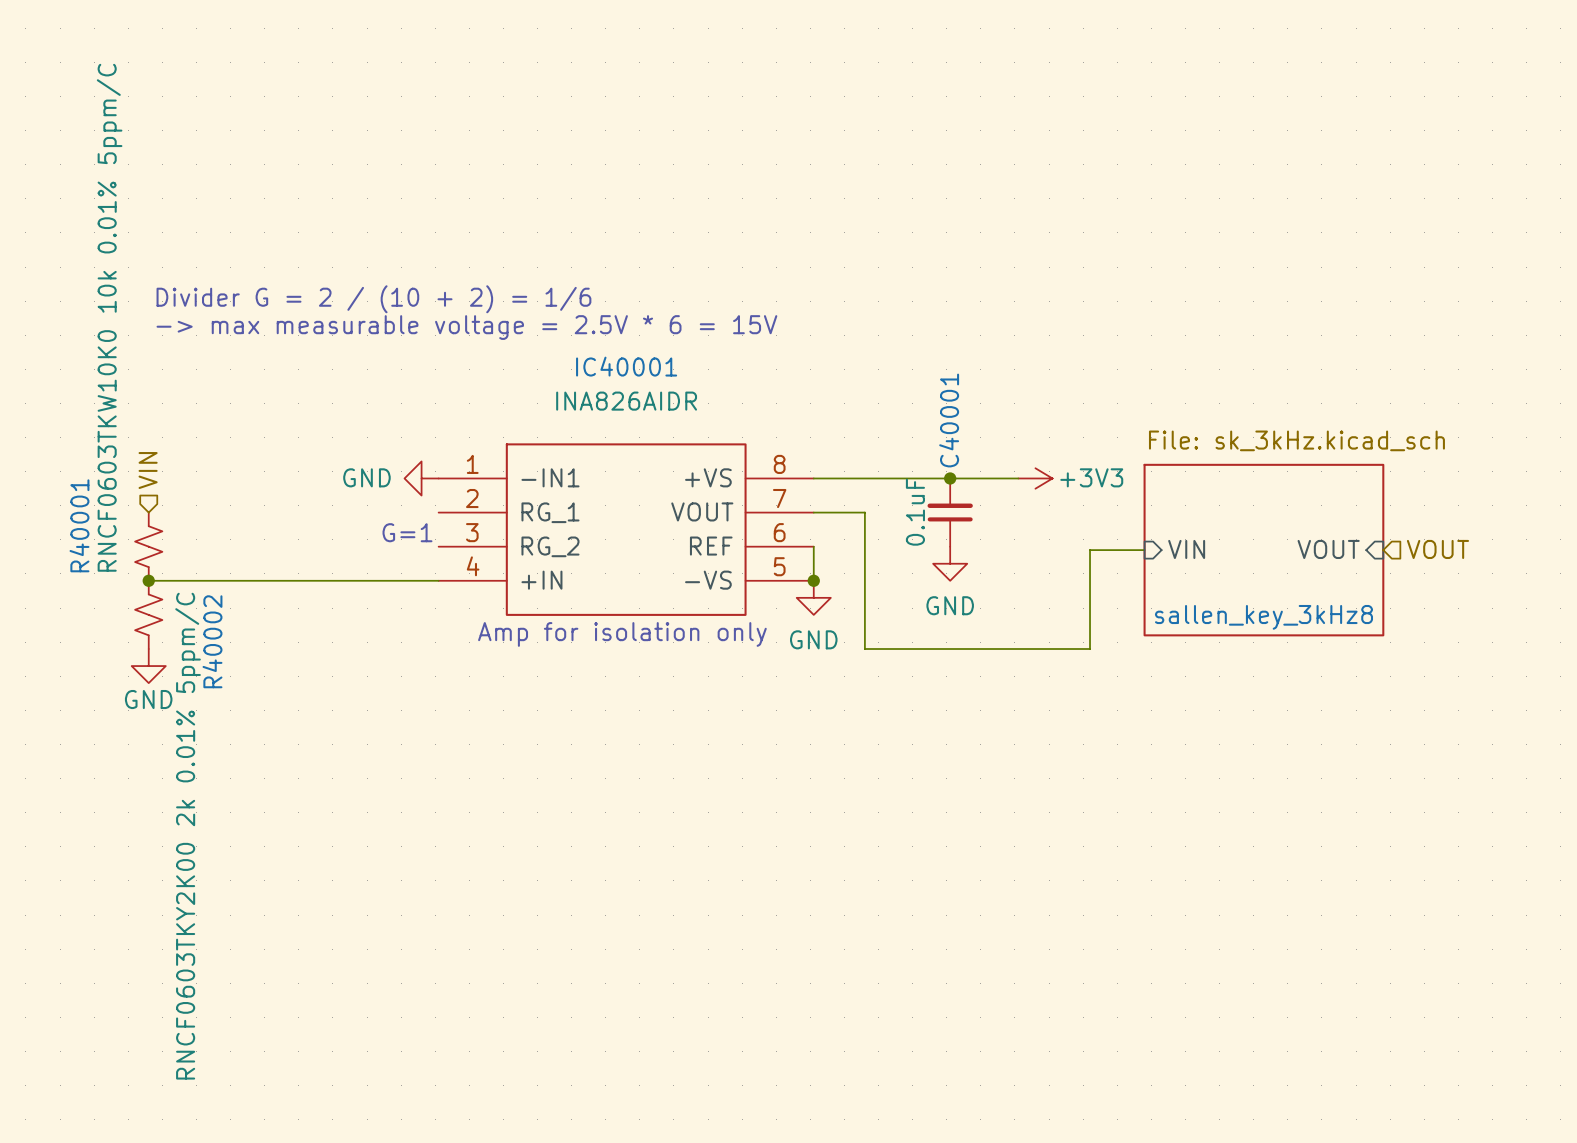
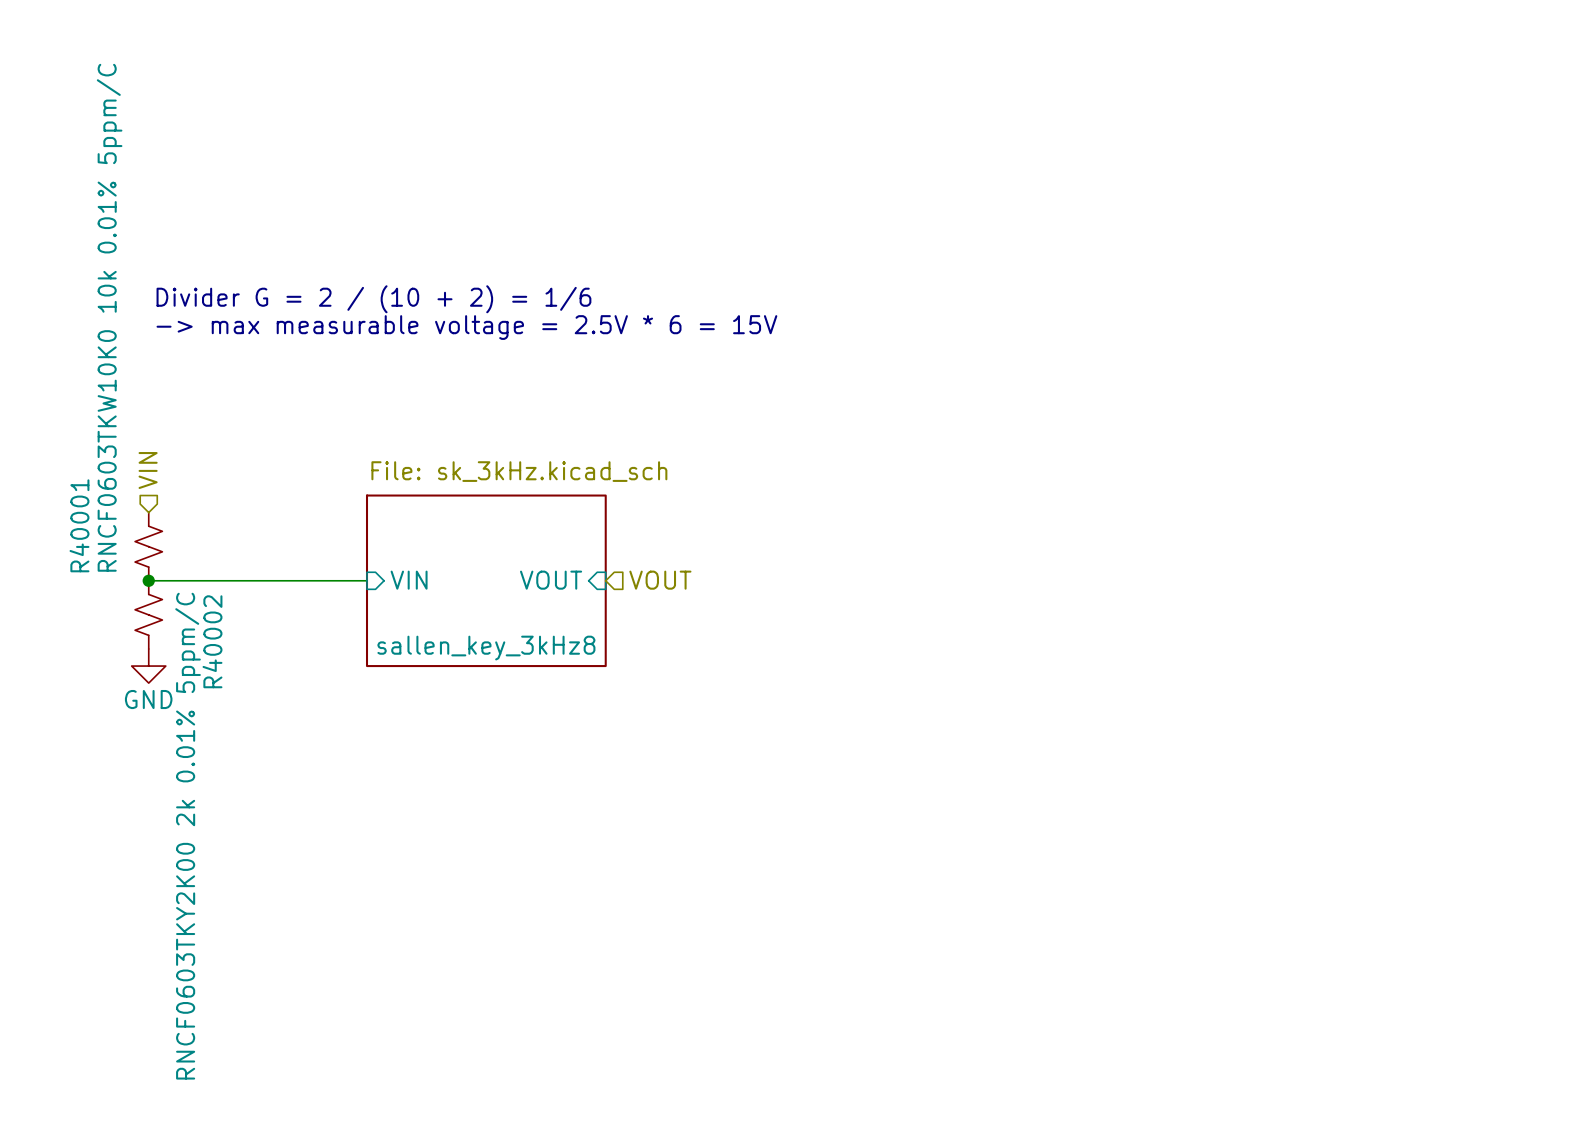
power symbol: GND (421, 478) -> none
wire: (813, 478) (1018, 478) -> none
junction: (950, 478) -> none
power symbol: +3V3 (1035, 478) -> none
wire: (813, 512) (864, 512) (864, 649) (1090, 649) (1090, 550) (1144, 550) -> none
C40001: 0.1uF (950, 512) -> none
IC40001: INA826AIDR (626, 529) -> none
text: G=1 (407, 532) -> none
wire: (813, 546) (813, 580) -> none
sheet pin: VIN (1186, 549) -> none
sheet pin: VOUT (1328, 549) -> none
hierarchical label: VOUT (1437, 549) -> none
sheet sallen_key_3kHz8 position: (1263, 550) -> (486, 580)
power symbol: GND (950, 563) -> none
wire: (367, 580) (438, 580) -> none
sheet pin: none -> VIN (409, 580)
sheet pin: none -> VOUT (551, 580)
hierarchical label: none -> VOUT (660, 580)
junction: (813, 580) -> none
power symbol: GND (813, 597) -> none
text: Amp for isolation only (622, 634) -> none

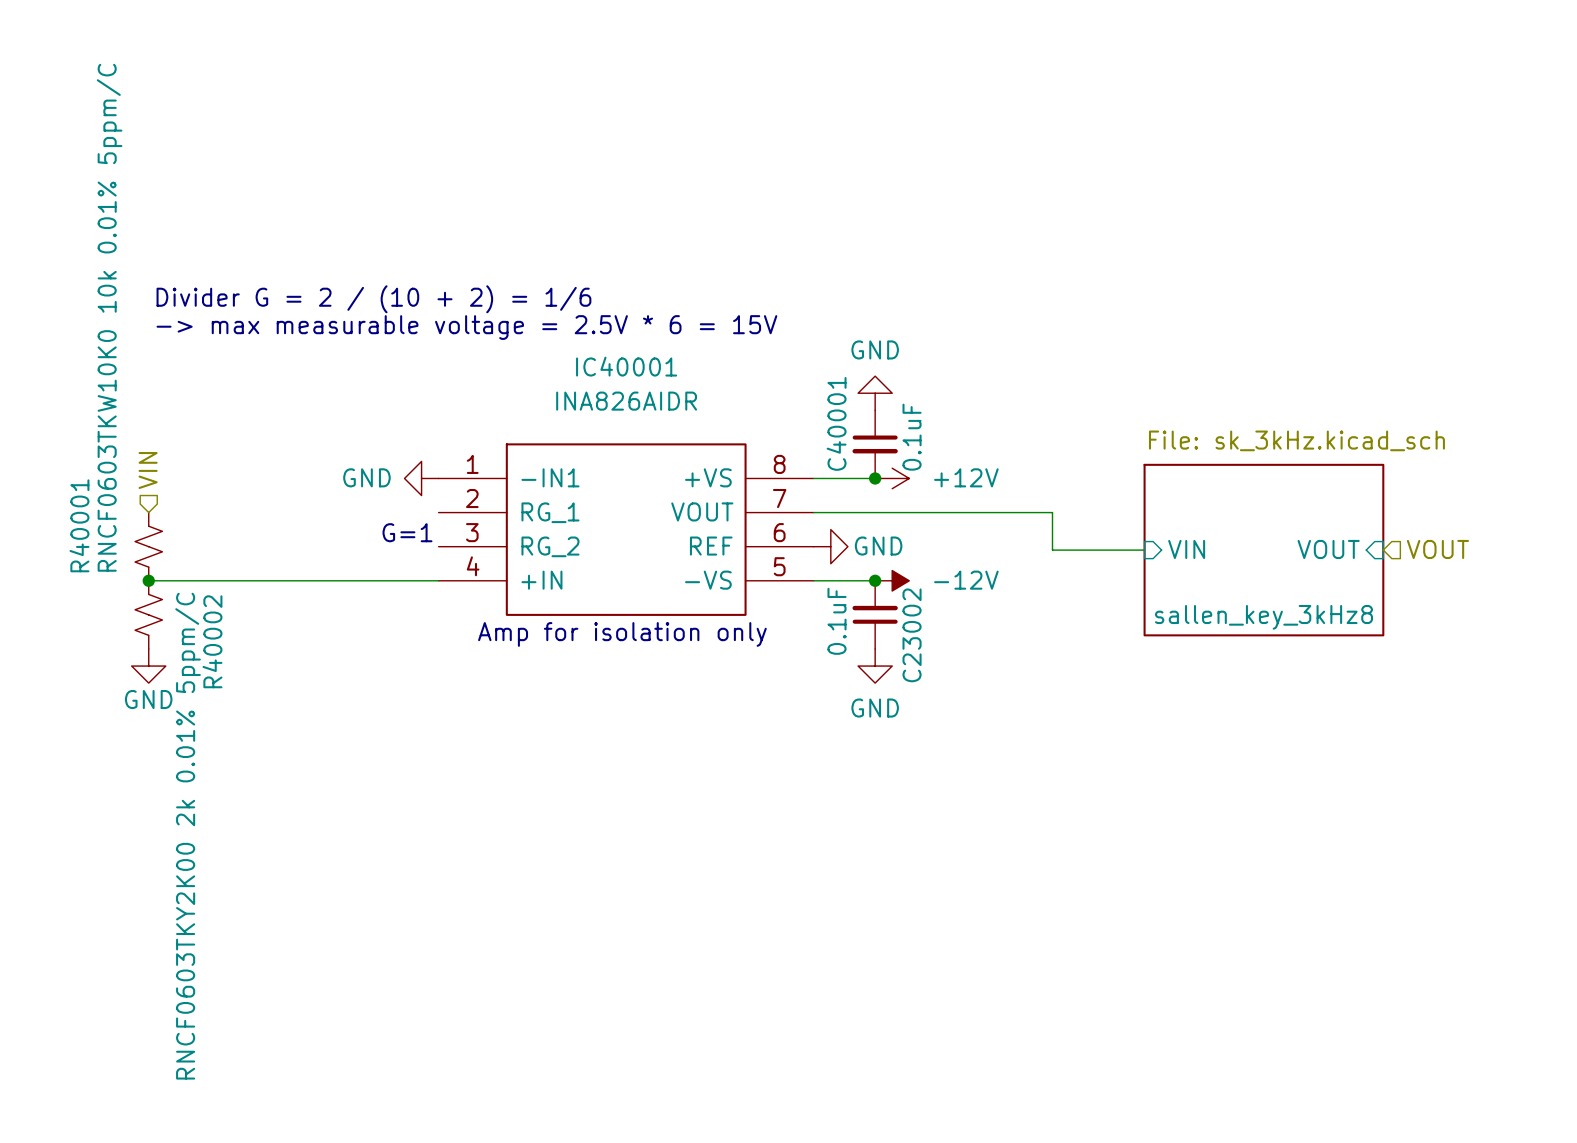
power symbol: none -> GND (875, 393)
C40001: none -> 0.1uF (875, 444)
power symbol: none -> GND (421, 478)
wire: none -> (813, 478) (875, 478)
junction: none -> (875, 478)
power symbol: none -> +12V (892, 478)
wire: none -> (813, 512) (1052, 512) (1052, 550) (1144, 550)
IC40001: none -> INA826AIDR (626, 529)
text: none -> G=1 (407, 532)
power symbol: none -> GND (830, 546)
sheet pin: none -> VIN (1186, 549)
sheet pin: none -> VOUT (1328, 549)
hierarchical label: none -> VOUT (1437, 549)
wire: none -> (367, 580) (438, 580)
sheet pin: VIN (409, 580) -> none
sheet sallen_key_3kHz8 position: (486, 580) -> (1263, 550)
sheet pin: VOUT (551, 580) -> none
hierarchical label: VOUT (660, 580) -> none
wire: none -> (813, 580) (875, 580)
junction: none -> (875, 580)
power symbol: none -> -12V (892, 580)
C23002: none -> 0.1uF (875, 614)
text: none -> Amp for isolation only (622, 634)
power symbol: none -> GND (875, 666)

